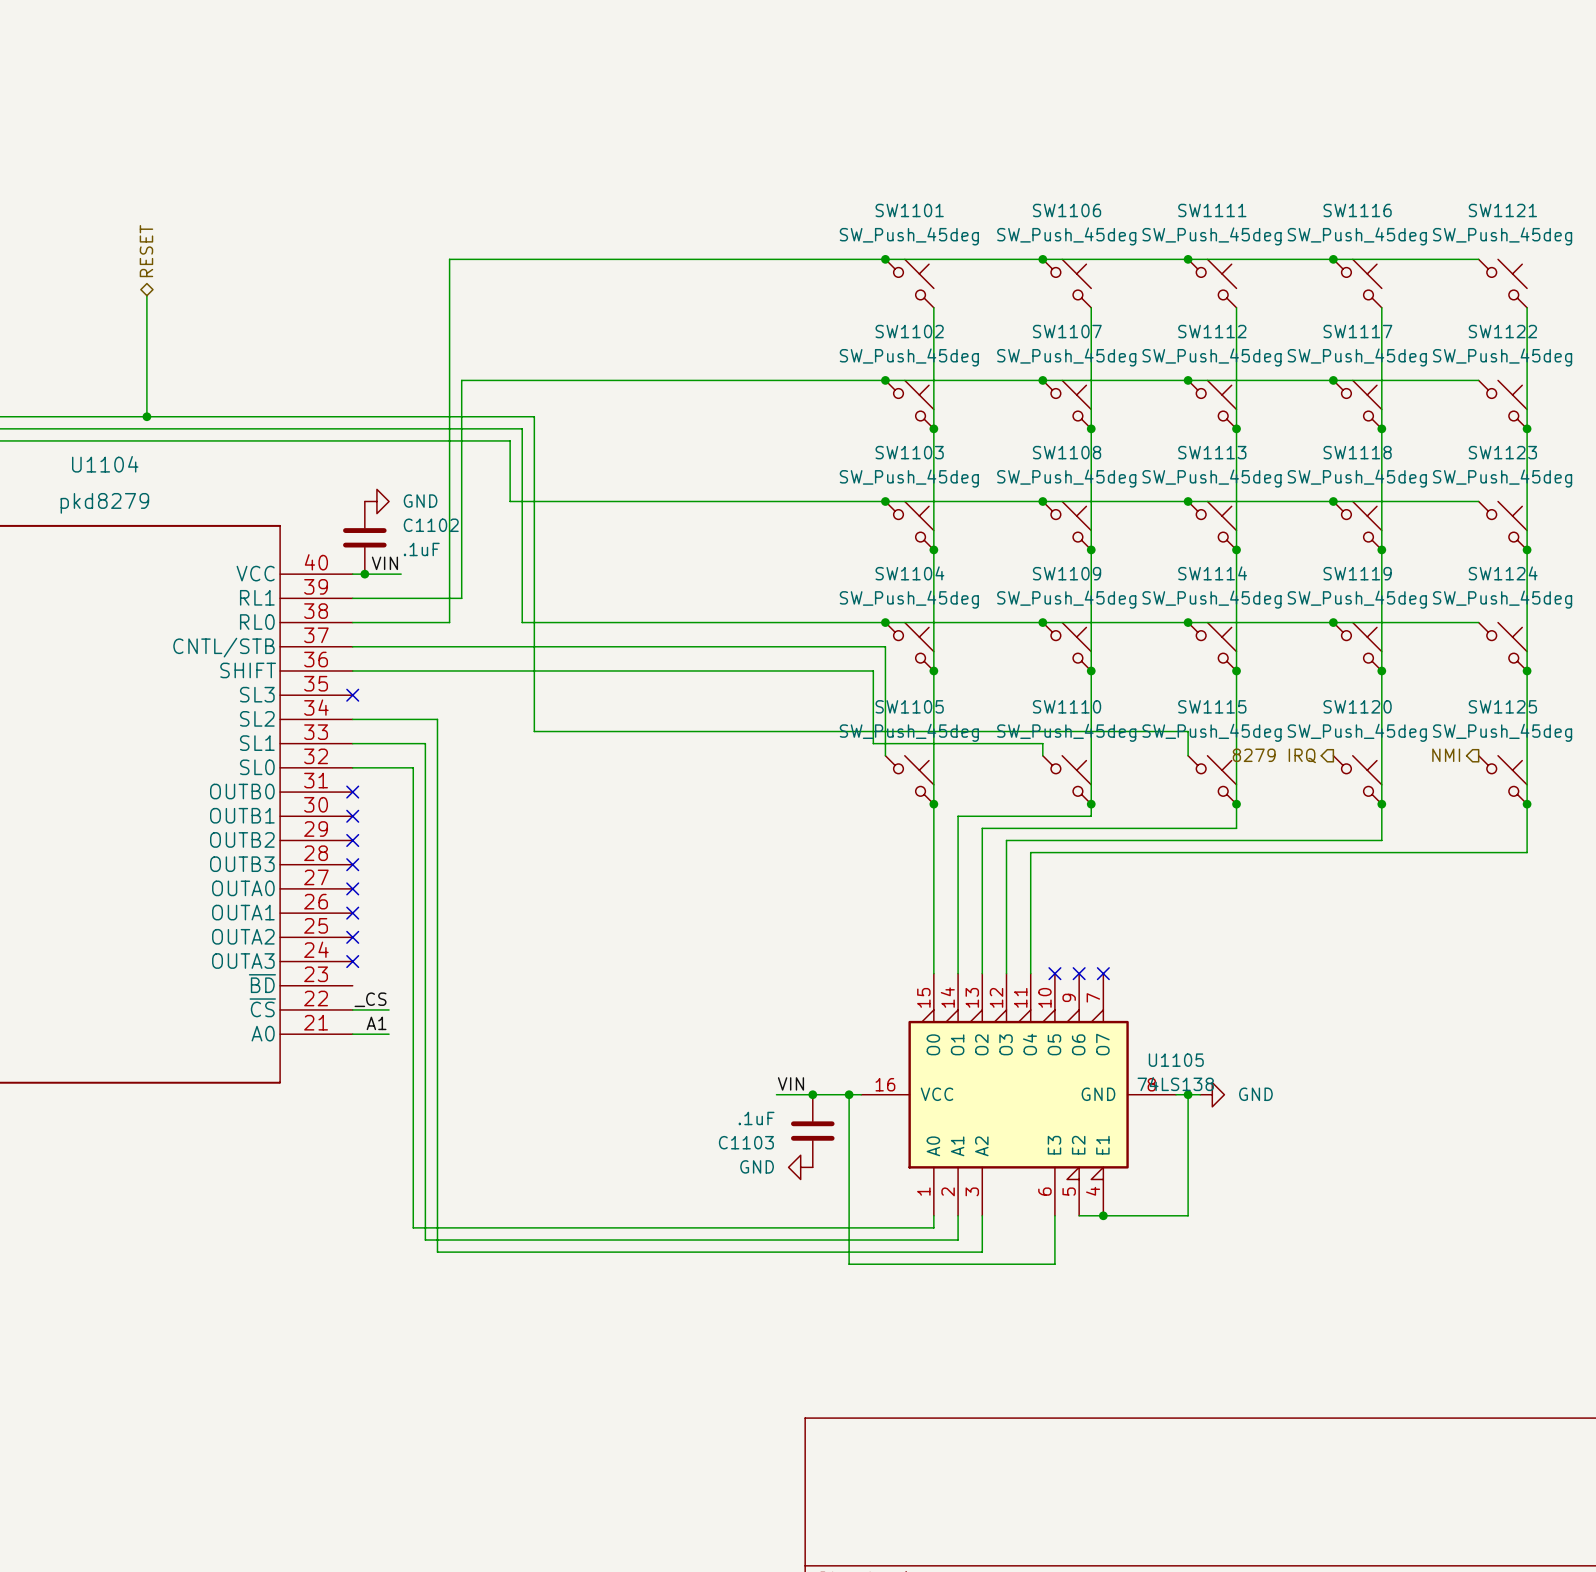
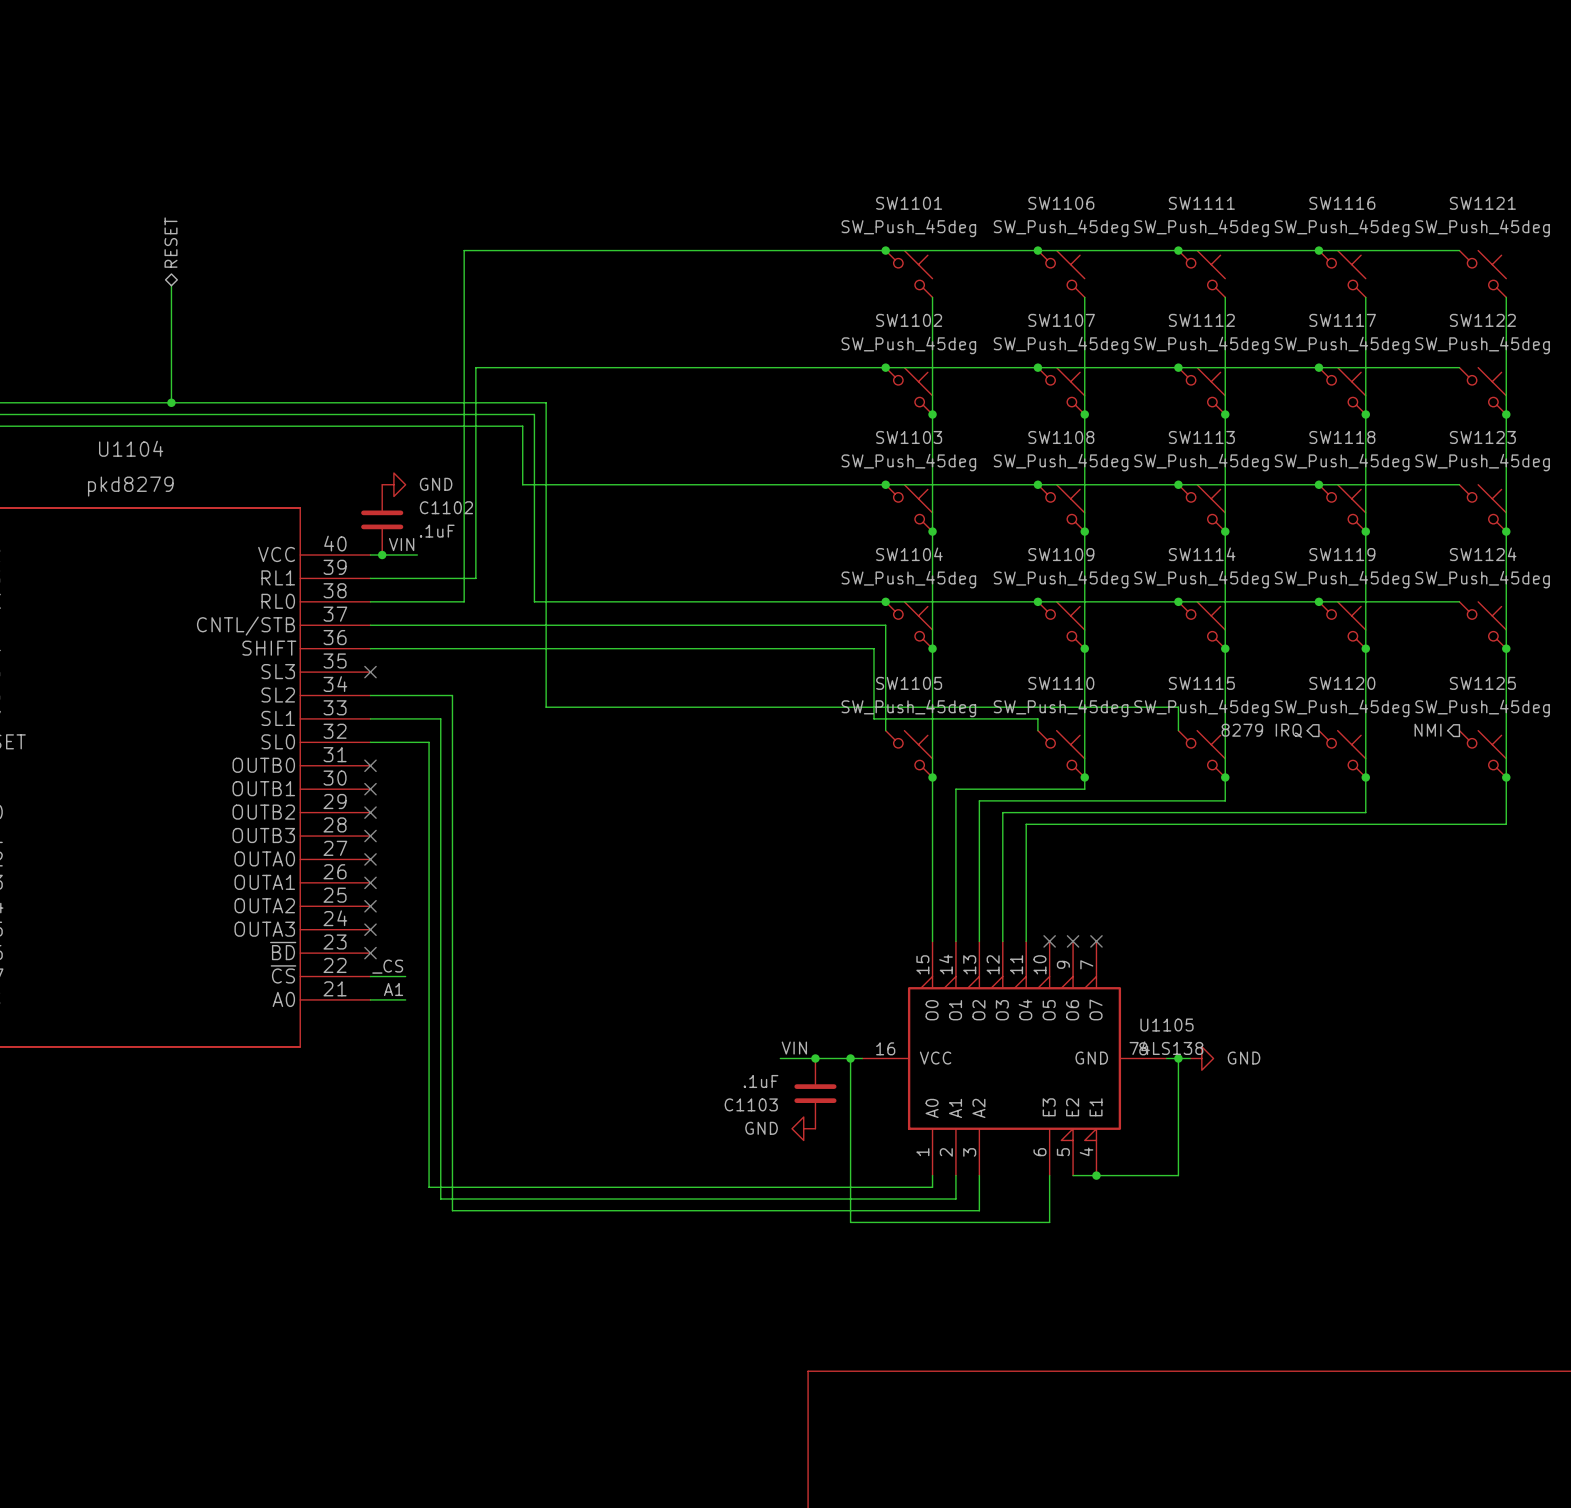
no-connect mark: none -> (370, 953)

